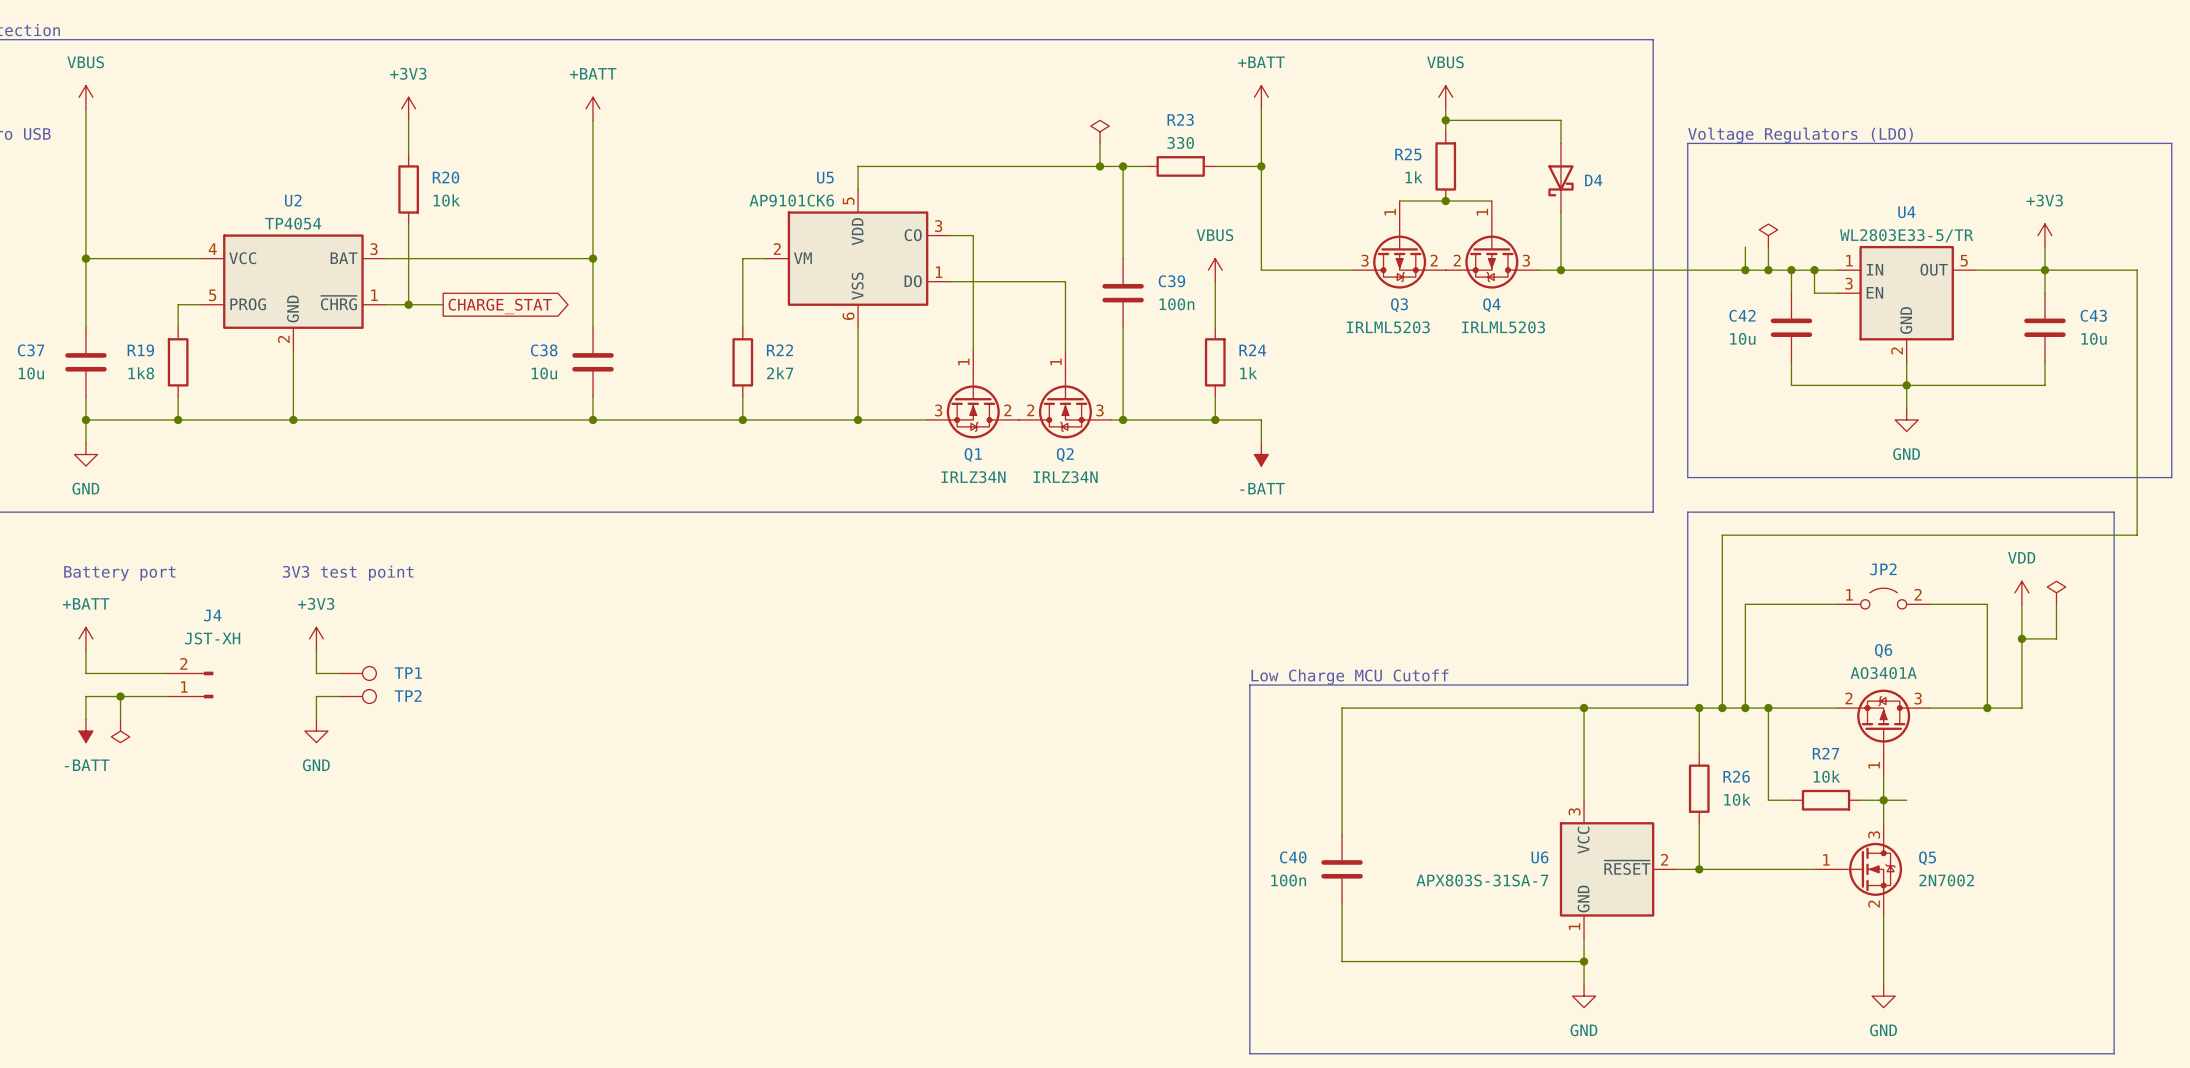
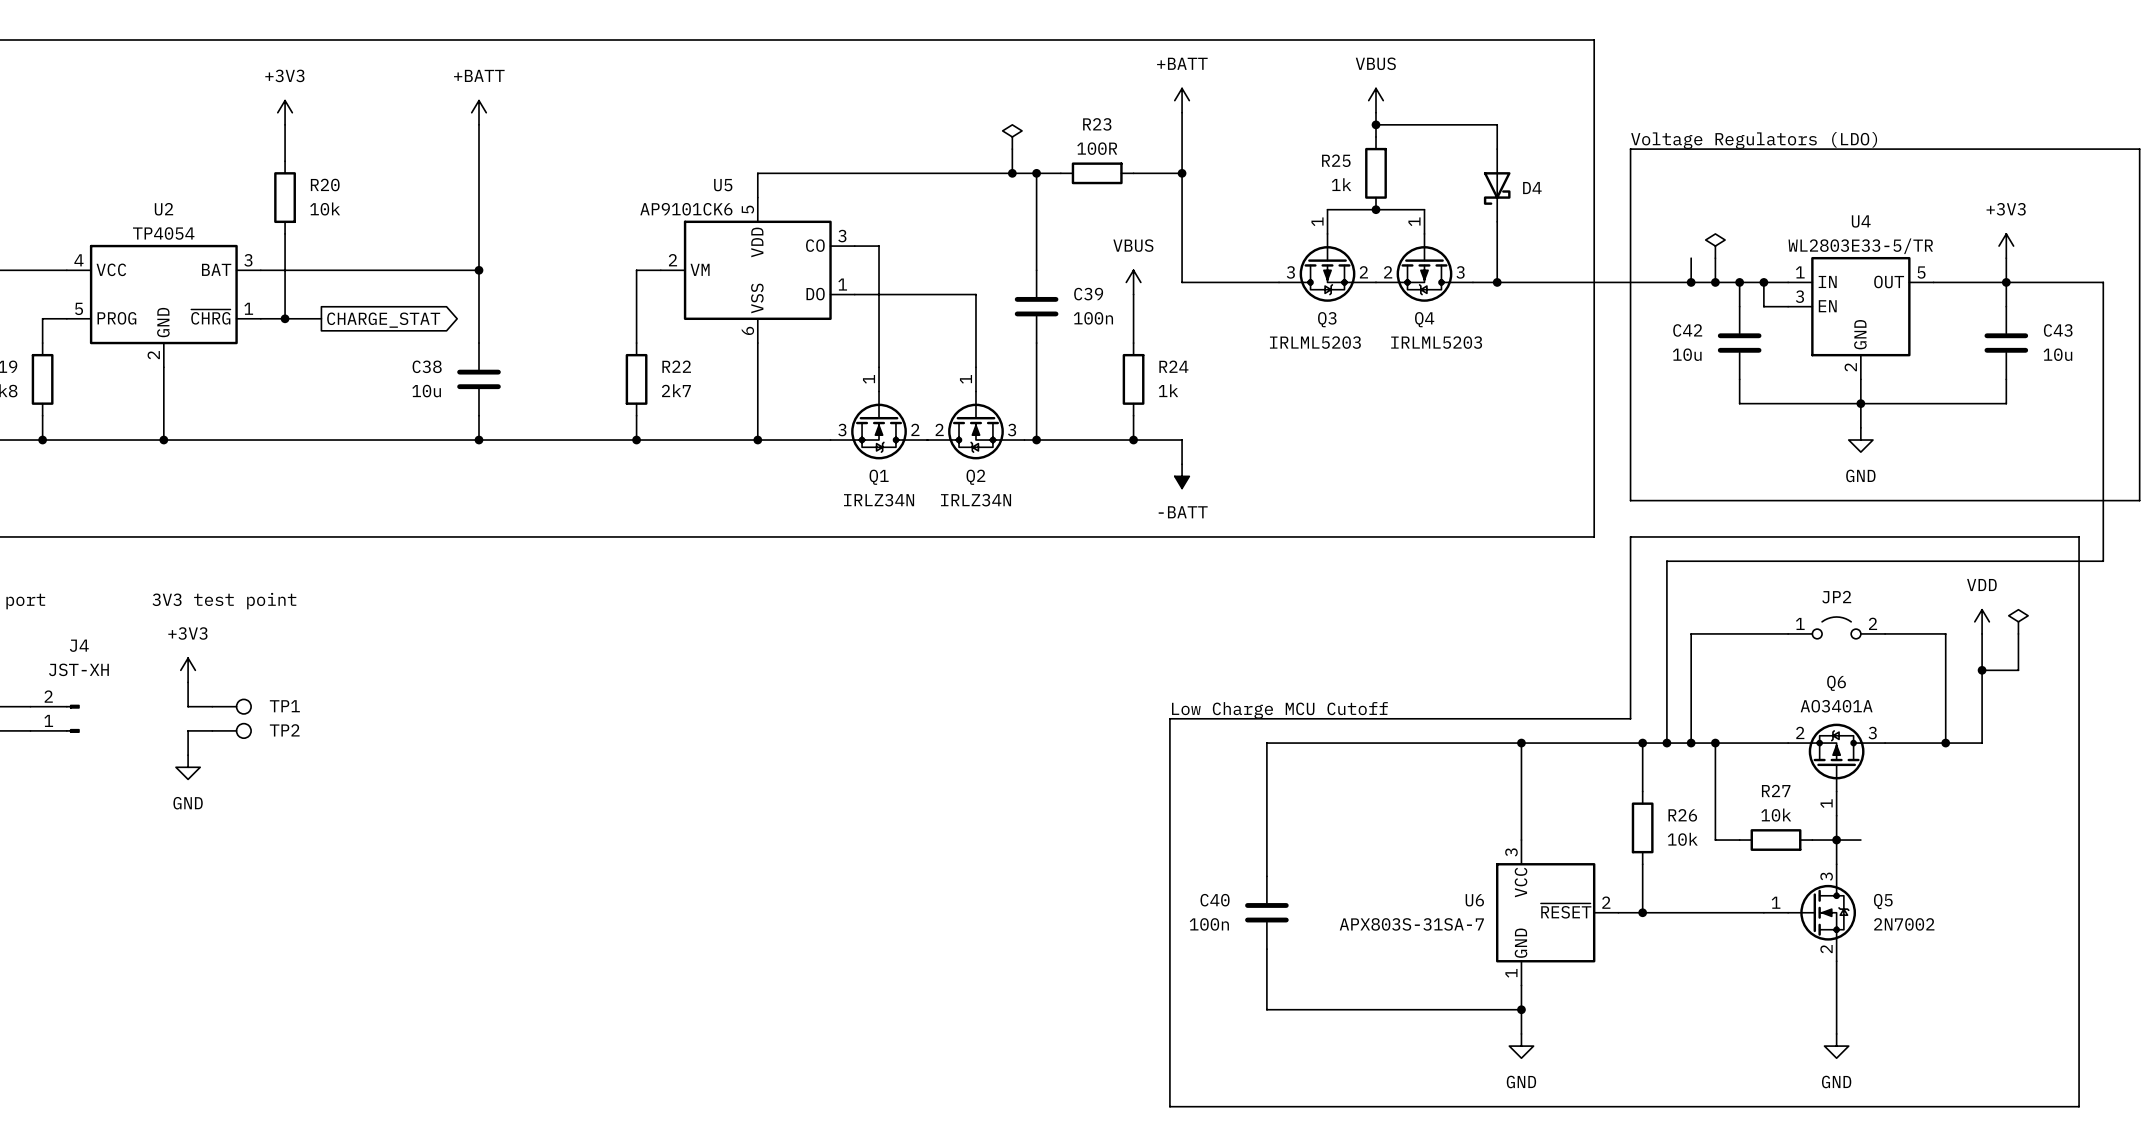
R23 value: 330 (1180, 142) -> 100R (1097, 148)

